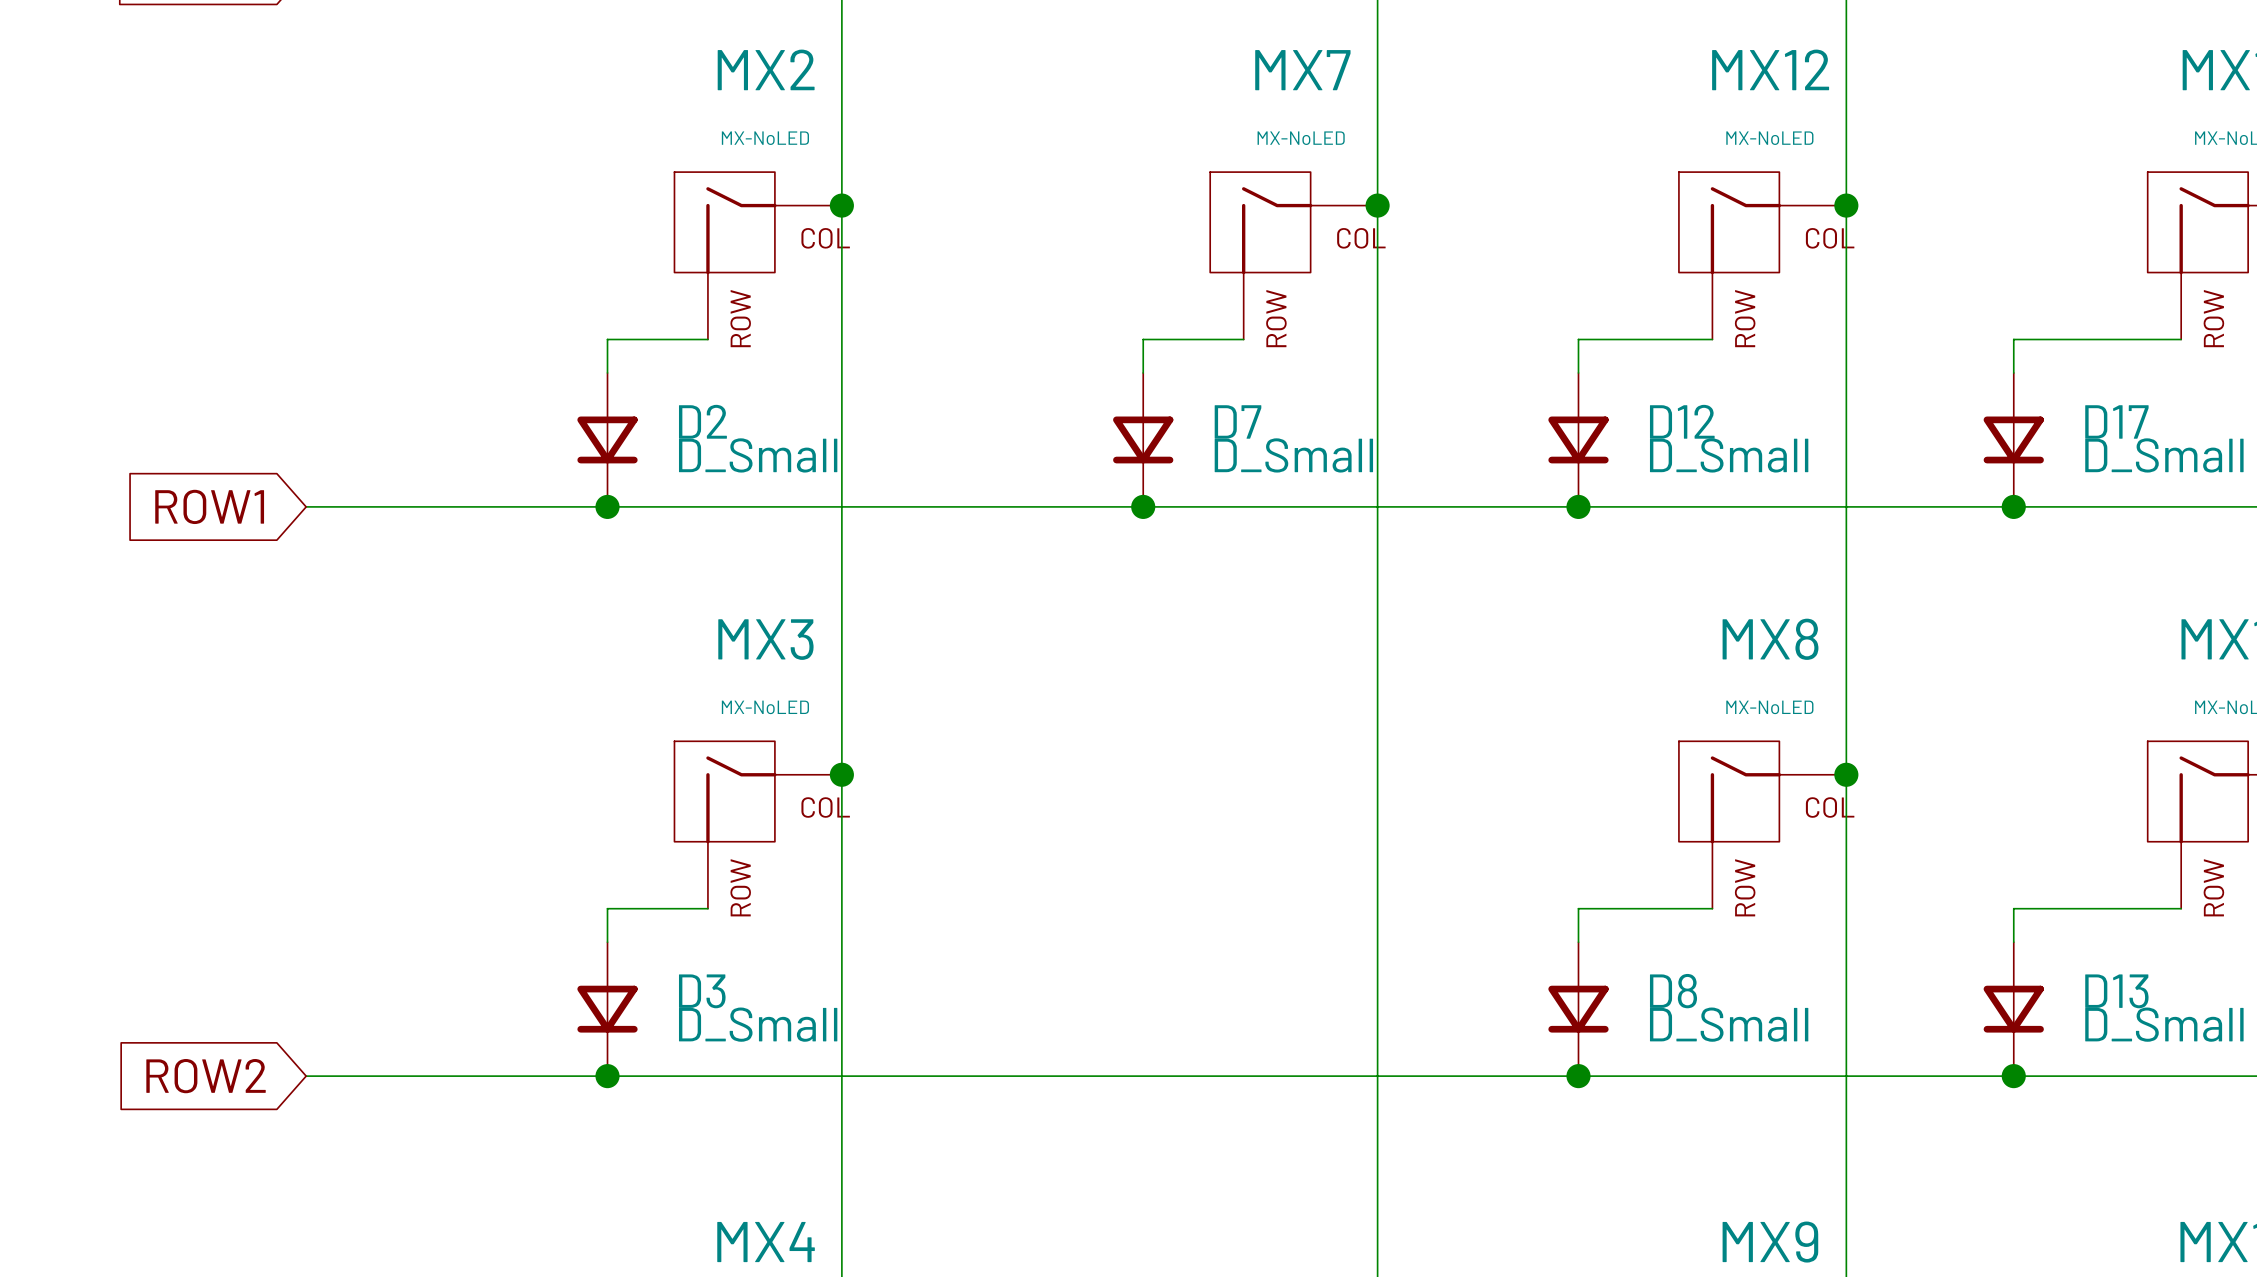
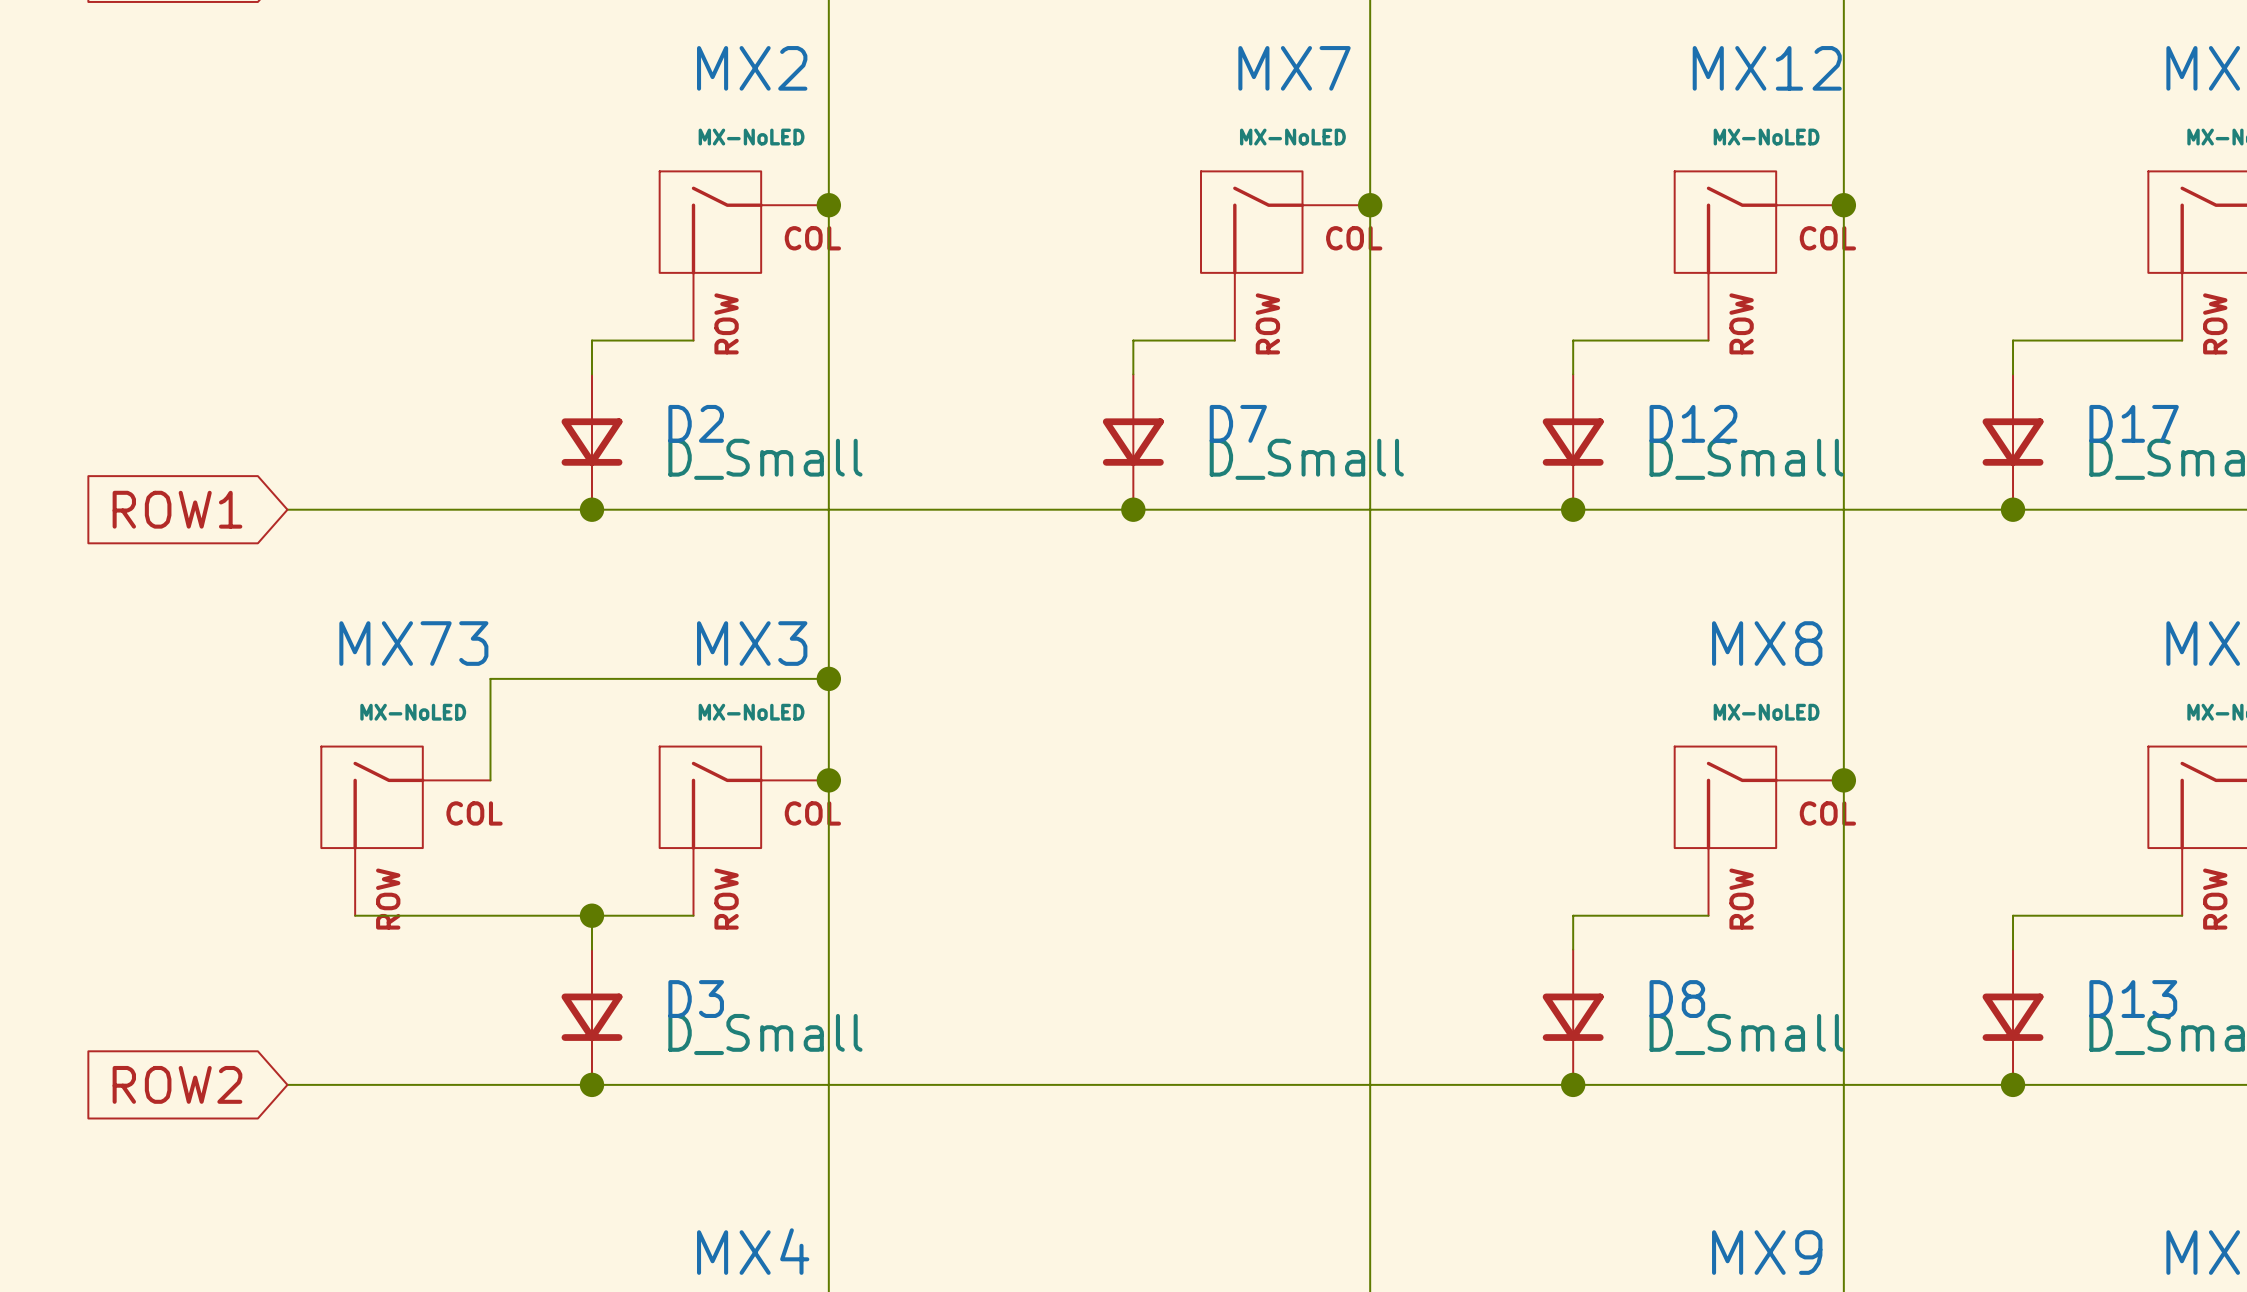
wire: none -> (828, 678) (490, 678) (490, 780)
junction: none -> (828, 678)
MX73: none -> MX-NoLED (405, 831)
wire: none -> (355, 915) (591, 915)
junction: none -> (591, 915)

